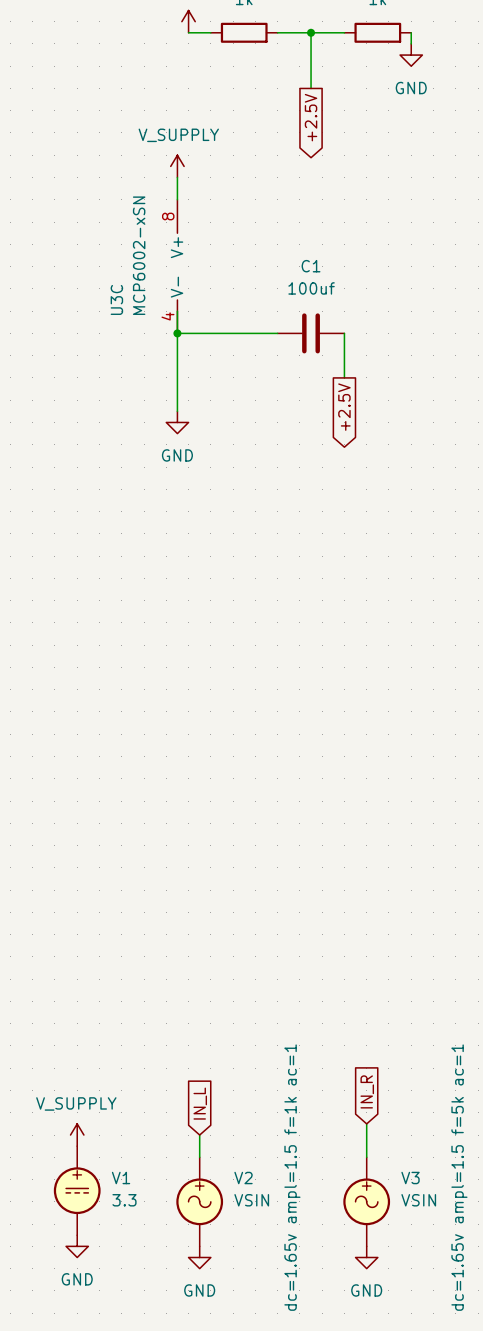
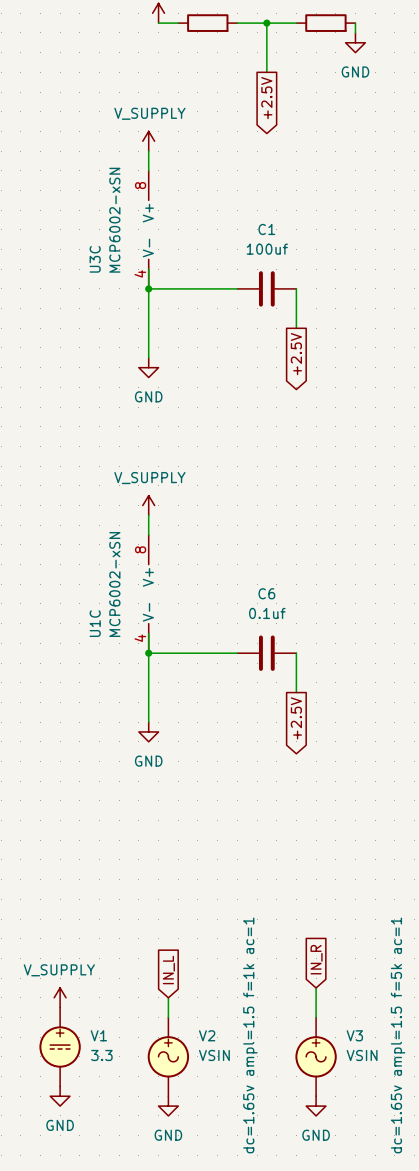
power symbol: none -> V_SUPPLY (148, 505)
wire: none -> (148, 515) (148, 535)
U1C: none -> MCP6002-xSN (148, 594)
wire: none -> (148, 633) (148, 722)
wire: none -> (148, 653) (237, 653)
junction: none -> (148, 653)
C6: none -> 0.1uf (266, 653)
wire: none -> (296, 653) (296, 692)
global label: none -> +2.5V (296, 718)
power symbol: none -> GND (148, 731)

